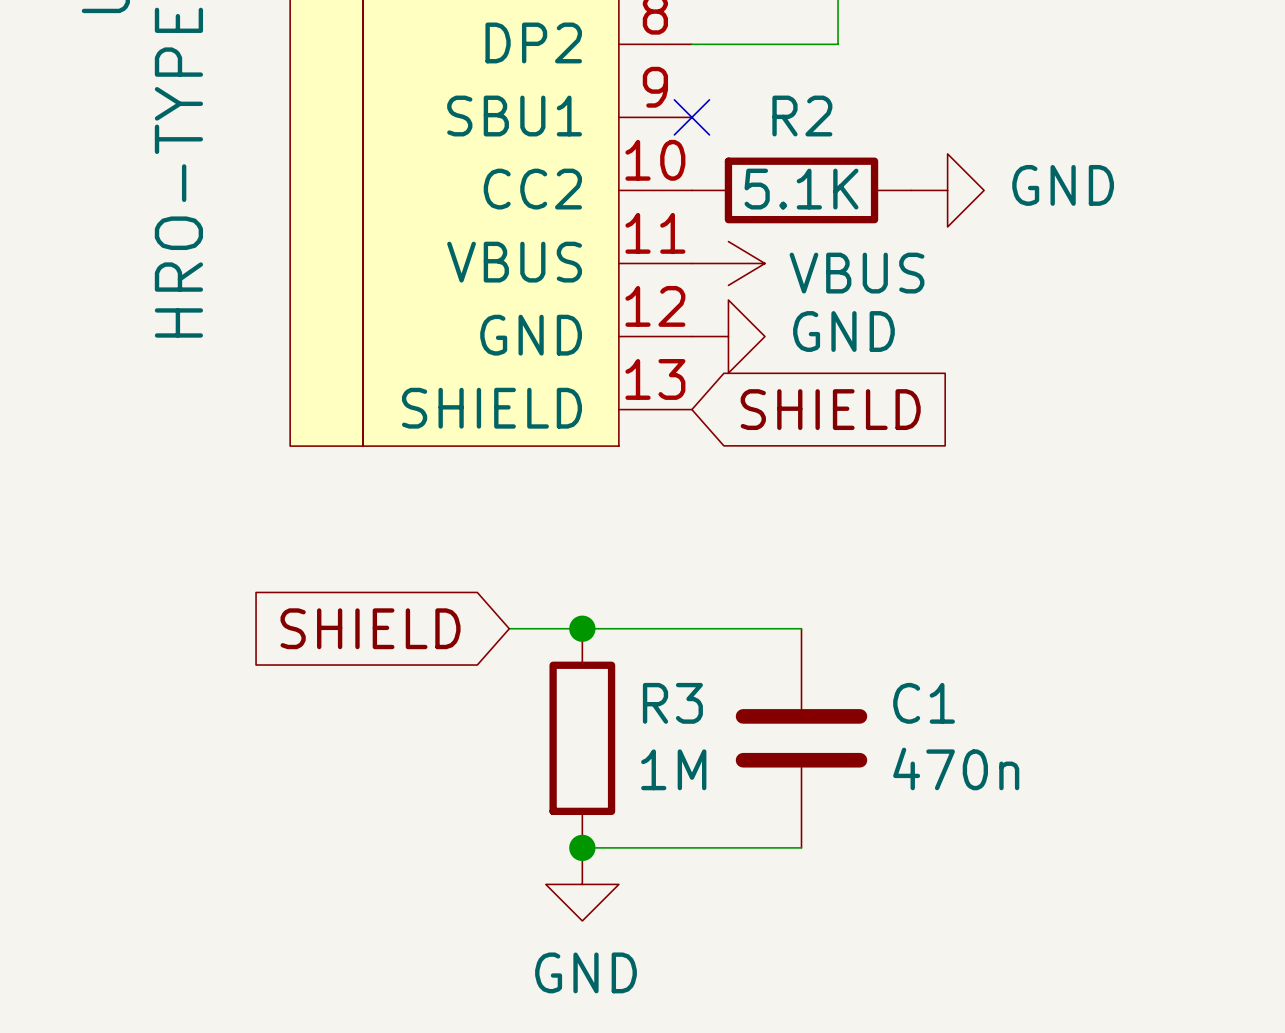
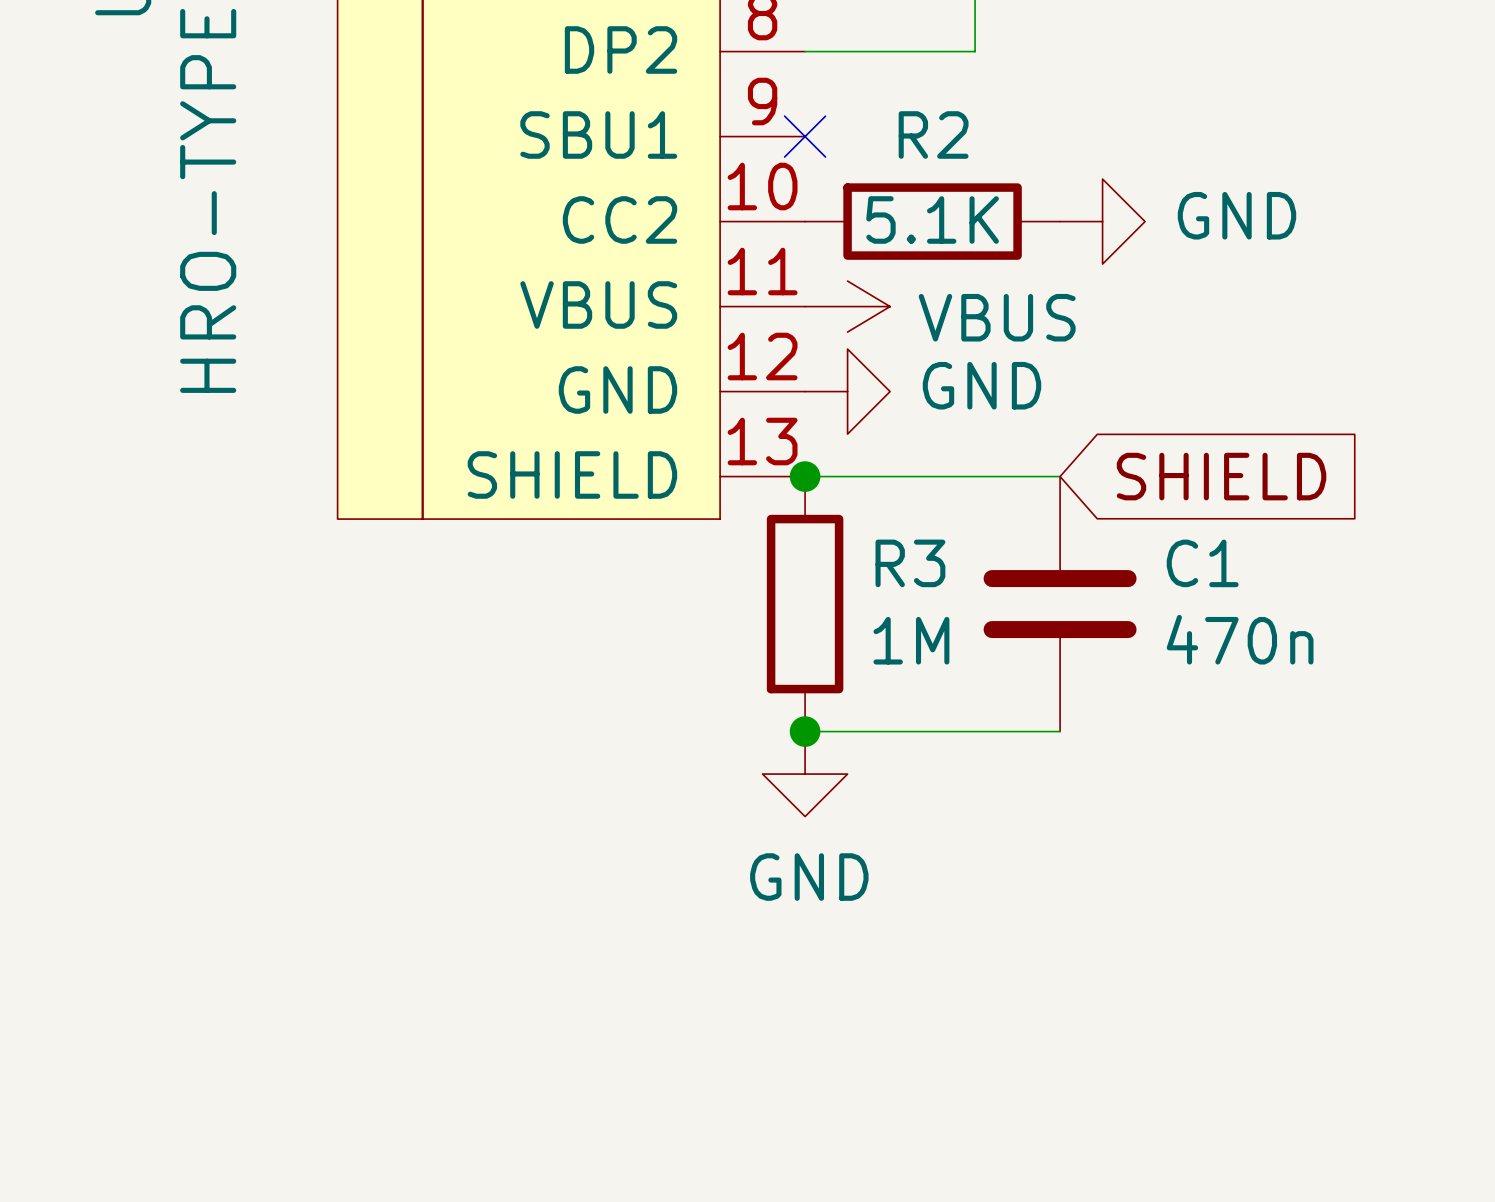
junction: none -> (805, 476)
global label position: SHIELD (830, 409) -> SHIELD (1221, 476)
global label: SHIELD (370, 628) -> none
wire: (509, 628) (691, 628) -> none
junction position: (582, 628) -> (805, 731)
wire: none -> (932, 731) (1060, 731)
R3 position: (582, 738) -> (805, 604)
C1 position: (801, 738) -> (1060, 604)
wire: (582, 847) (801, 847) -> (805, 476) (1060, 476)
junction: (582, 847) -> none
power symbol position: GND (582, 884) -> GND (805, 774)

